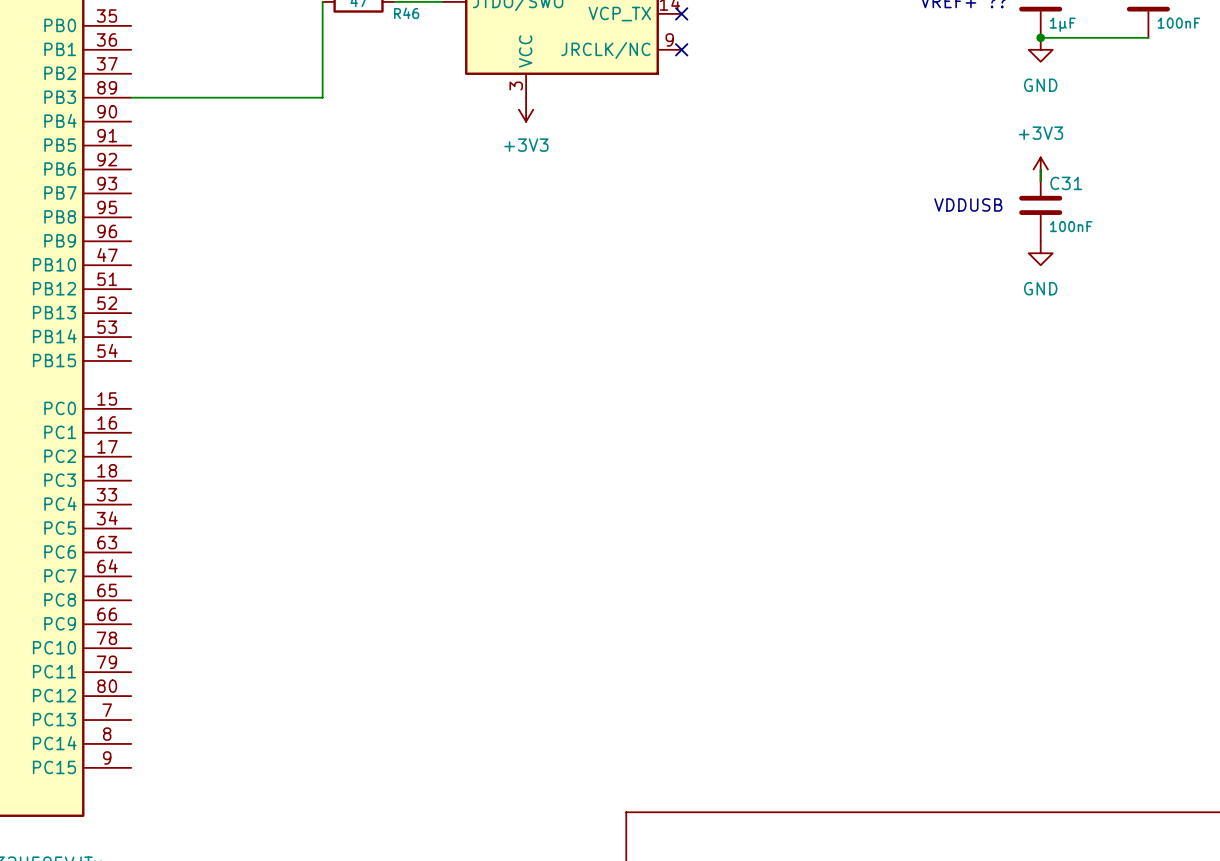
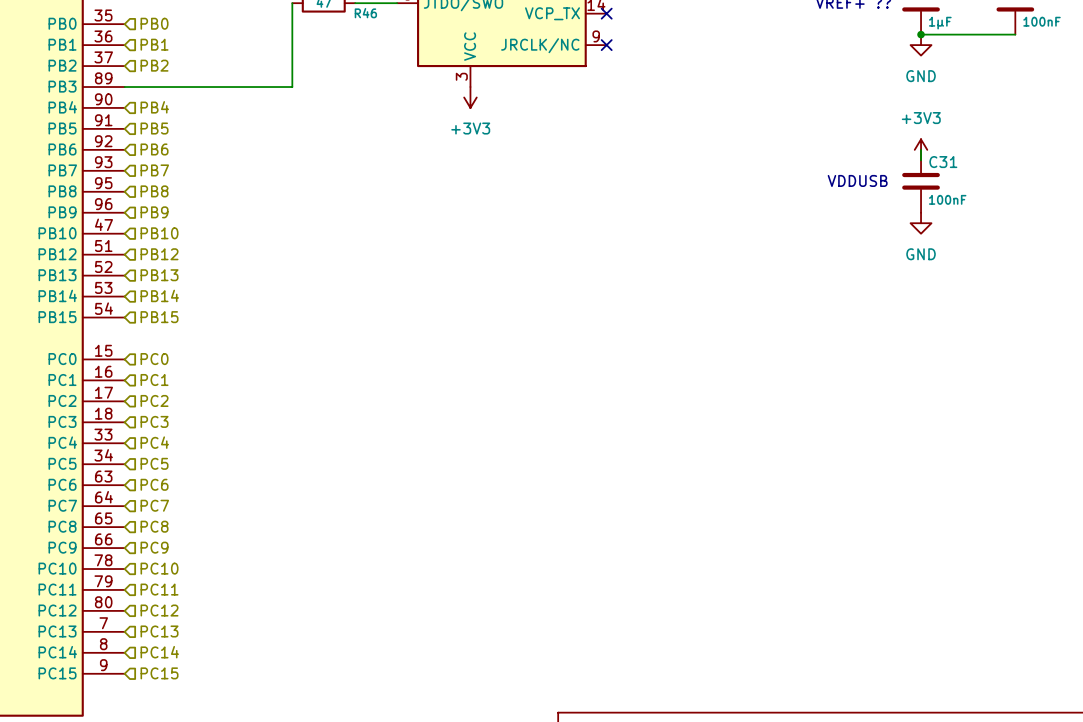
hierarchical label: none -> PB0 (154, 23)
hierarchical label: none -> PB1 (154, 44)
hierarchical label: none -> PB2 (154, 65)
hierarchical label: none -> PB4 (154, 107)
hierarchical label: none -> PB5 (154, 128)
hierarchical label: none -> PB6 (154, 149)
hierarchical label: none -> PB7 (154, 170)
hierarchical label: none -> PB8 (154, 191)
hierarchical label: none -> PB9 (154, 212)
hierarchical label: none -> PB10 (159, 233)
hierarchical label: none -> PB12 (159, 254)
hierarchical label: none -> PB13 (159, 275)
hierarchical label: none -> PB14 (159, 295)
hierarchical label: none -> PB15 (159, 317)
hierarchical label: none -> PC0 (154, 359)
hierarchical label: none -> PC1 (154, 380)
hierarchical label: none -> PC2 (154, 400)
hierarchical label: none -> PC3 (154, 421)
hierarchical label: none -> PC4 (154, 442)
hierarchical label: none -> PC5 (154, 463)
hierarchical label: none -> PC6 (154, 484)
hierarchical label: none -> PC7 (154, 505)
hierarchical label: none -> PC8 (154, 526)
hierarchical label: none -> PC9 (154, 547)
hierarchical label: none -> PC10 (159, 568)
hierarchical label: none -> PC11 (159, 589)
hierarchical label: none -> PC12 (159, 610)
hierarchical label: none -> PC13 (159, 631)
hierarchical label: none -> PC14 (159, 652)
hierarchical label: none -> PC15 (159, 673)

